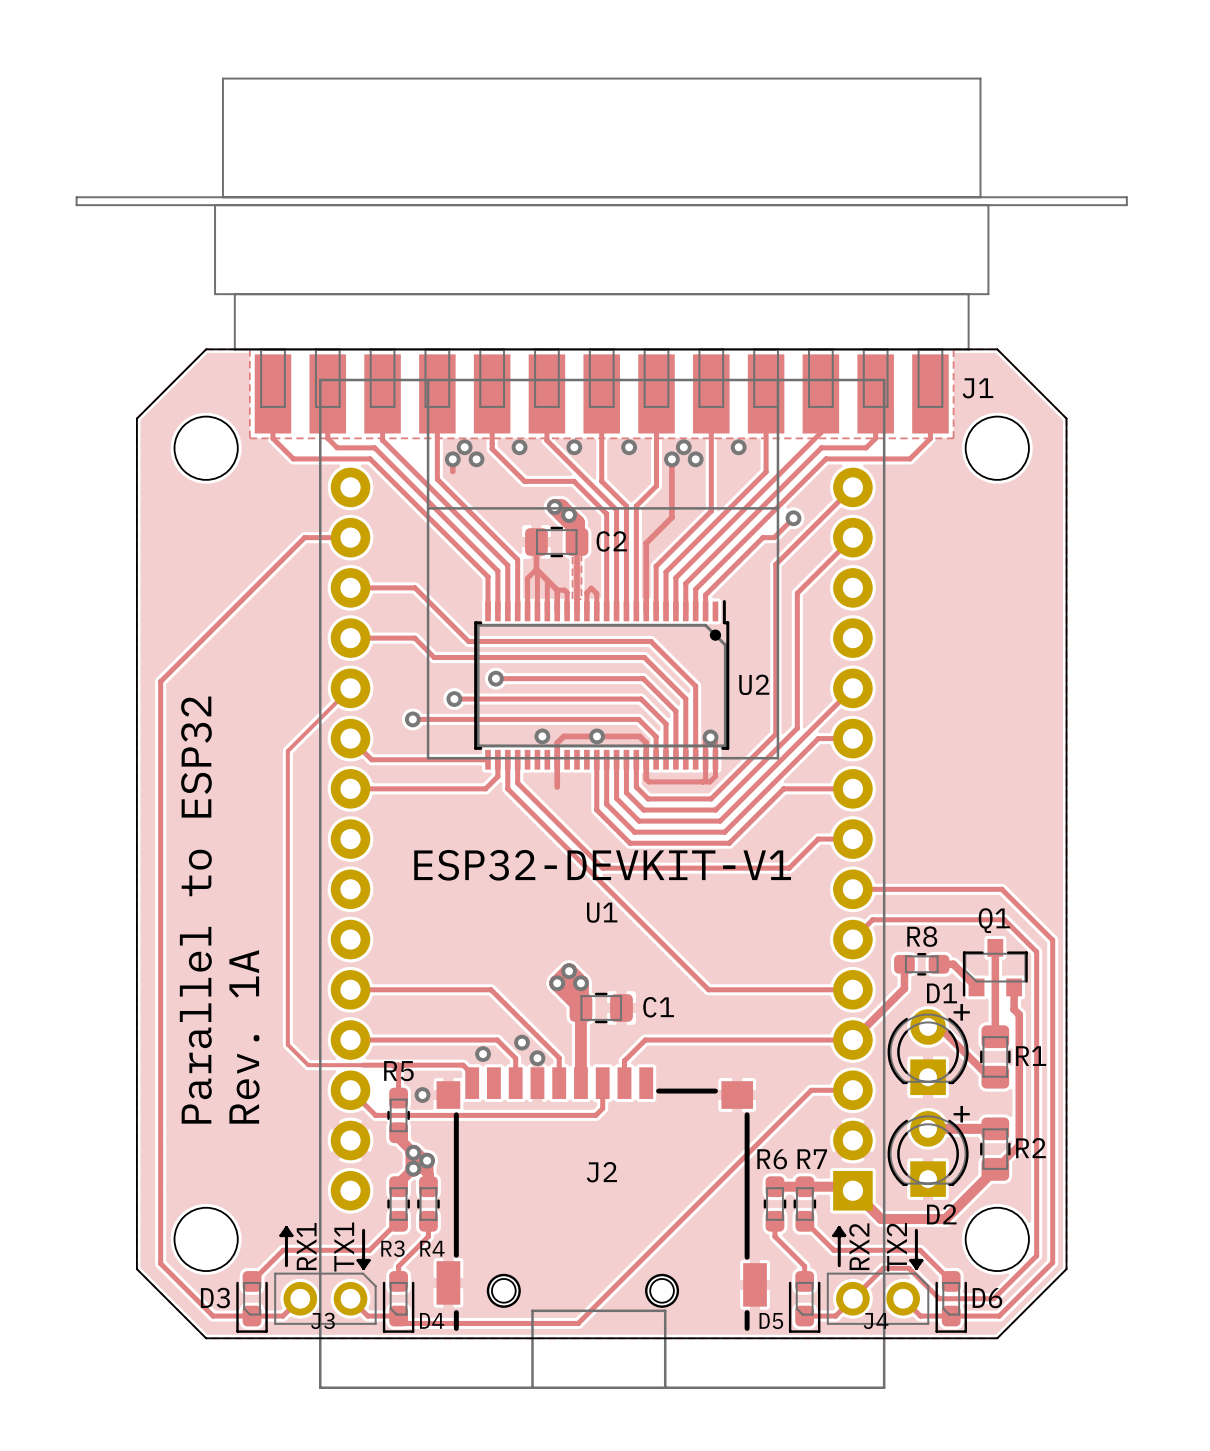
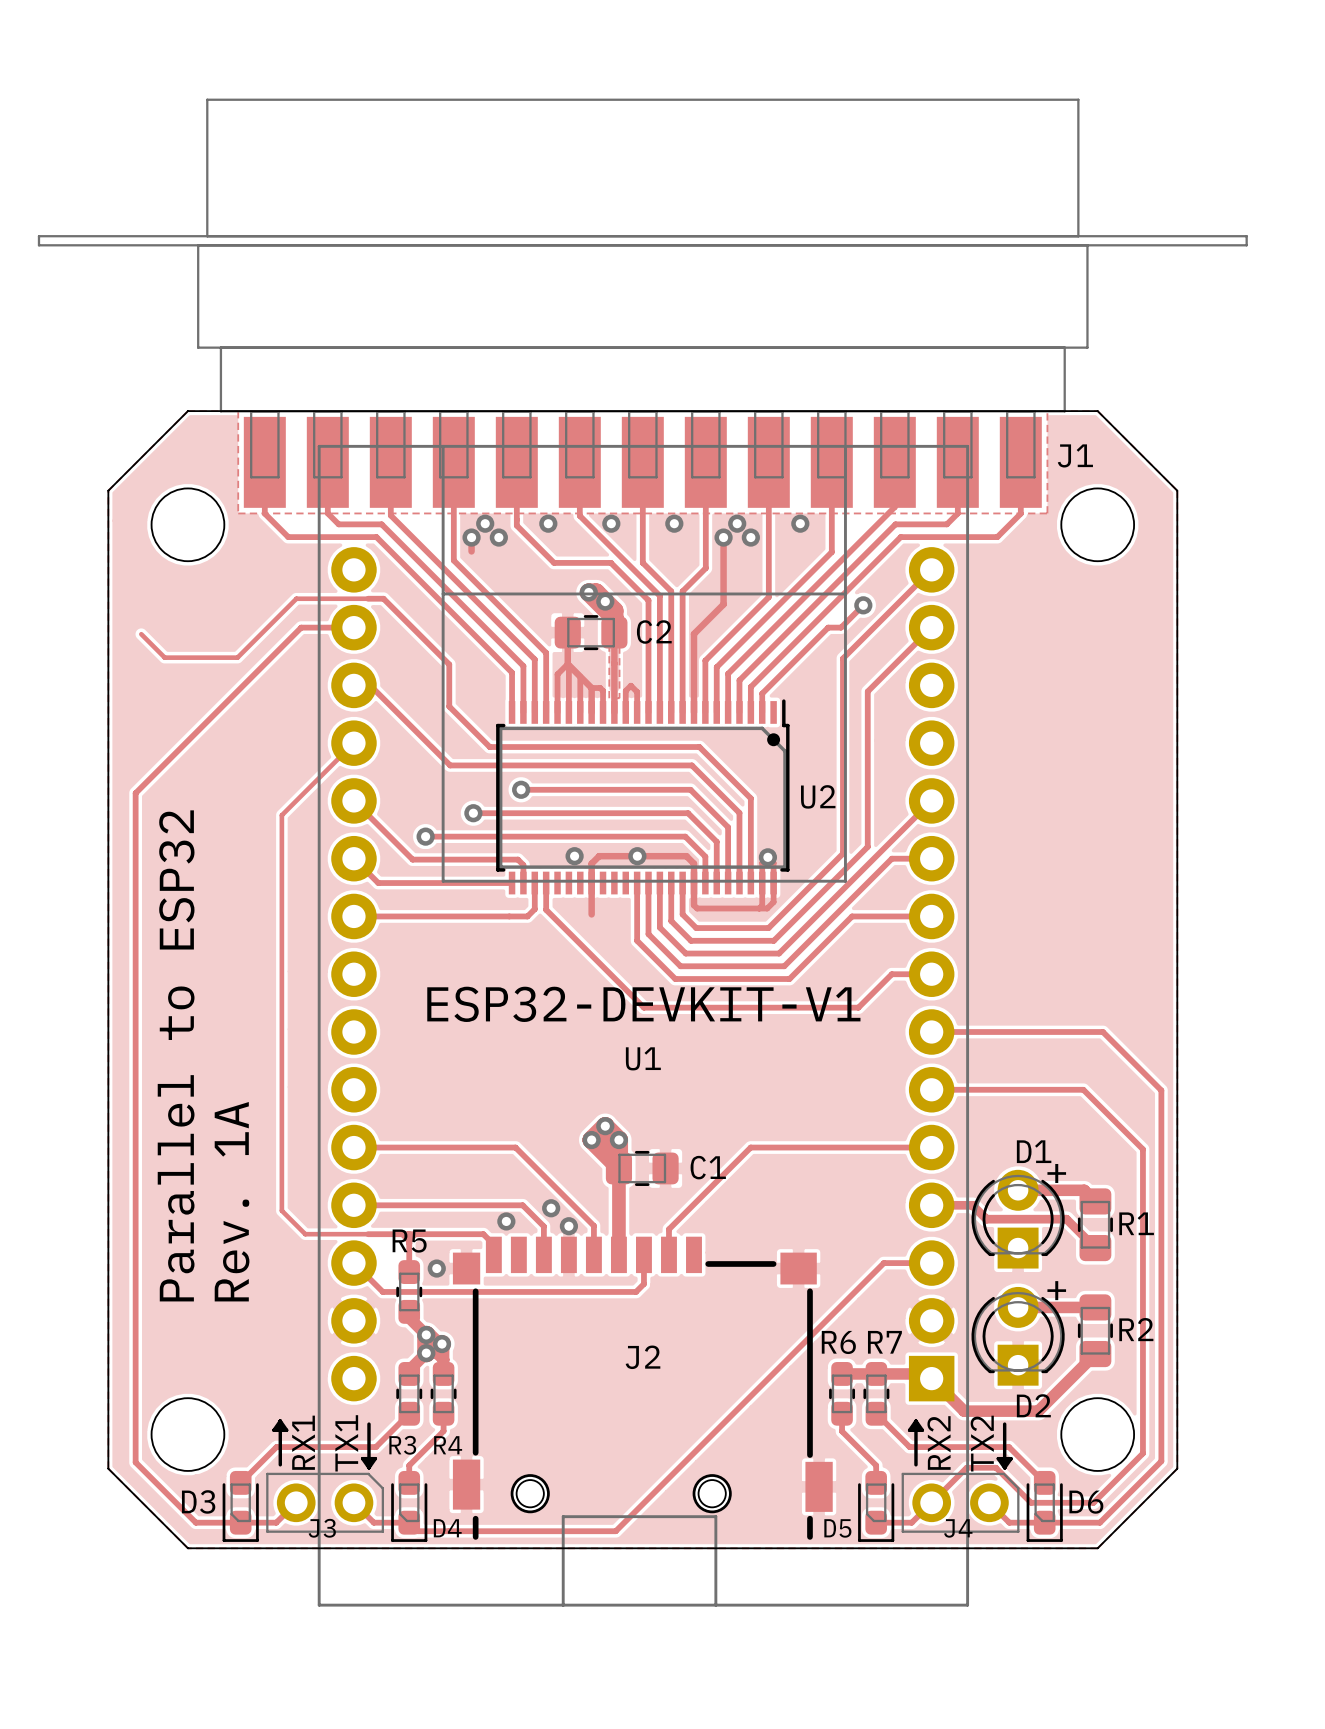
track: none -> (141, 634) (164, 657) (237, 657) (296, 598) (383, 598) (449, 664) (449, 706)
track: (364, 587) (415, 587) (433, 606) -> (370, 685) (427, 743)
track: (350, 638) (414, 638) -> none
track: (350, 688) (287, 751) -> (353, 743) (281, 815) (281, 873)
track: none -> (353, 800) (412, 859) (517, 859) (523, 865) (523, 883)
track: (497, 759) (497, 776) (485, 788) -> (534, 909) (527, 916) (509, 916)
track: (507, 782) (507, 788) (708, 989) -> none
track: (852, 939) (872, 919) (1004, 919) (1036, 952) (1036, 991) -> (931, 1089) (1083, 1089) (1142, 1149)
track: (995, 947) (995, 1036) -> none
track: (904, 964) (904, 988) (852, 1040) (645, 1040) -> (765, 1147) (750, 1147) (692, 1205)
R8: (921, 964) -> none
track: (939, 964) (953, 964) (976, 987) -> none
Q1: (995, 967) -> none
track: (1014, 987) (1014, 1009) (1019, 1014) (1019, 1145) (995, 1169) -> none
track: (939, 1026) (989, 1077) (995, 1077) -> (1030, 1190) (1084, 1190) (1095, 1201)
track: none -> (931, 1205) (972, 1205) (986, 1219) (1066, 1219) (1095, 1248)

